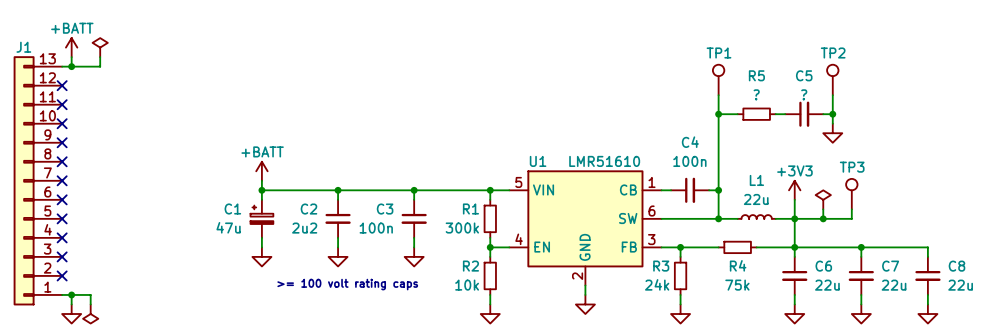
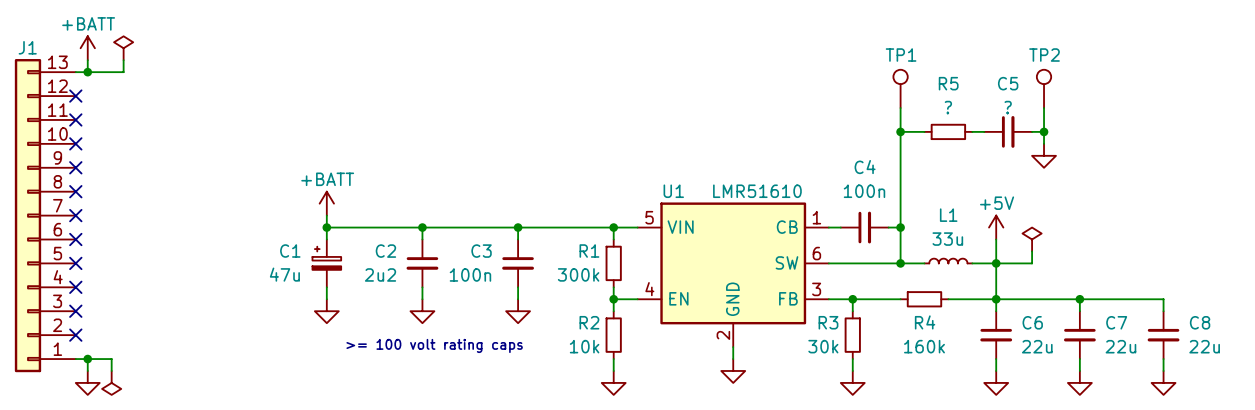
power symbol: +3V3 (794, 190) -> +5V (996, 227)
TP3: (851, 194) -> none
L1 value: 22u (756, 199) -> 33u (947, 239)
wire: (851, 209) (851, 218) (823, 218) -> none
junction: (823, 218) -> none
R3 value: 24k (657, 284) -> 30k (823, 346)
R4 value: 75k (737, 285) -> 160k (924, 346)

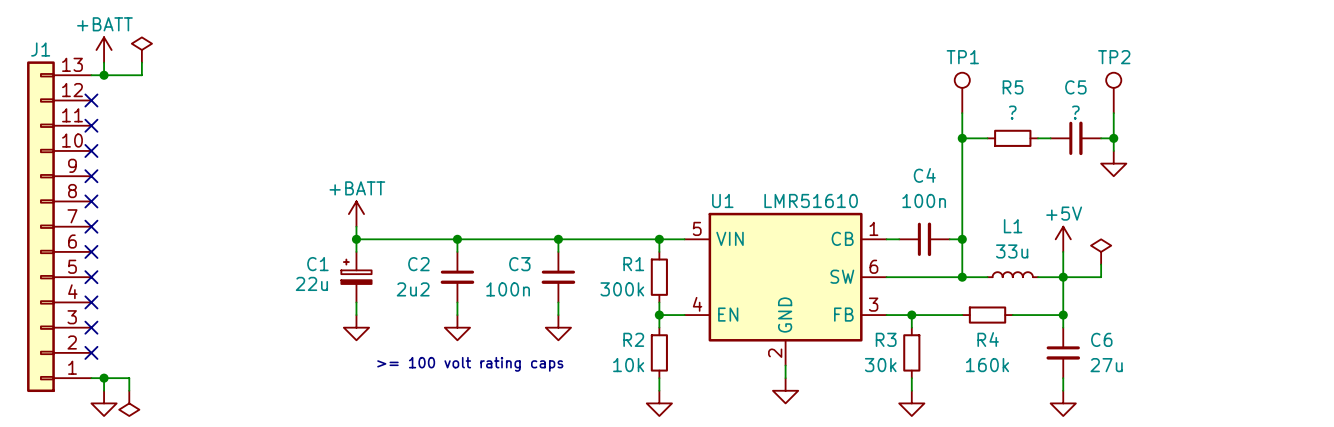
C1 value: 47u (284, 274) -> 22u (311, 283)
wire: (996, 299) (1163, 299) (1163, 311) -> none
wire: (1079, 299) (1079, 311) -> none
junction: (1079, 299) -> none
C7: 22u (1079, 335) -> none
C8: 22u (1163, 335) -> none
C6 value: 22u (1037, 346) -> 27u (1106, 365)
wire: (1079, 359) (1079, 370) -> none
wire: (1163, 359) (1163, 370) -> none
power symbol: (1079, 382) -> none
power symbol: (1163, 382) -> none

